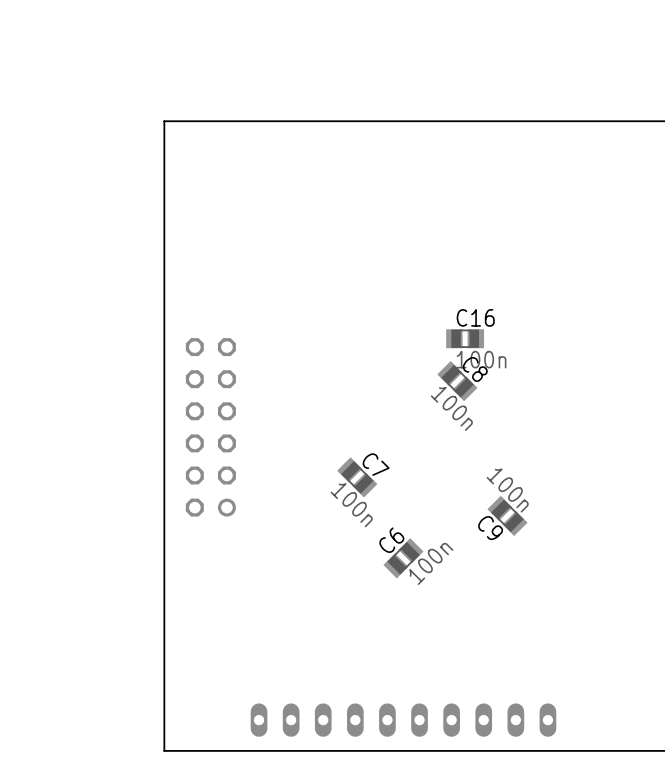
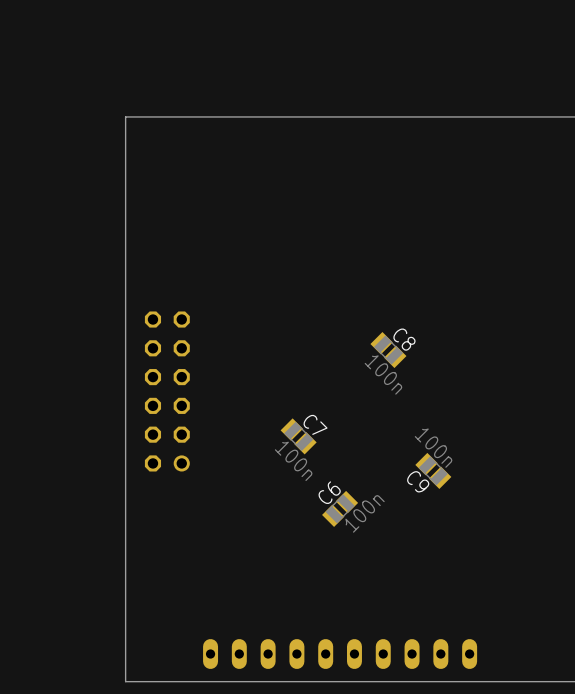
C16: 100n (465, 338) -> none

